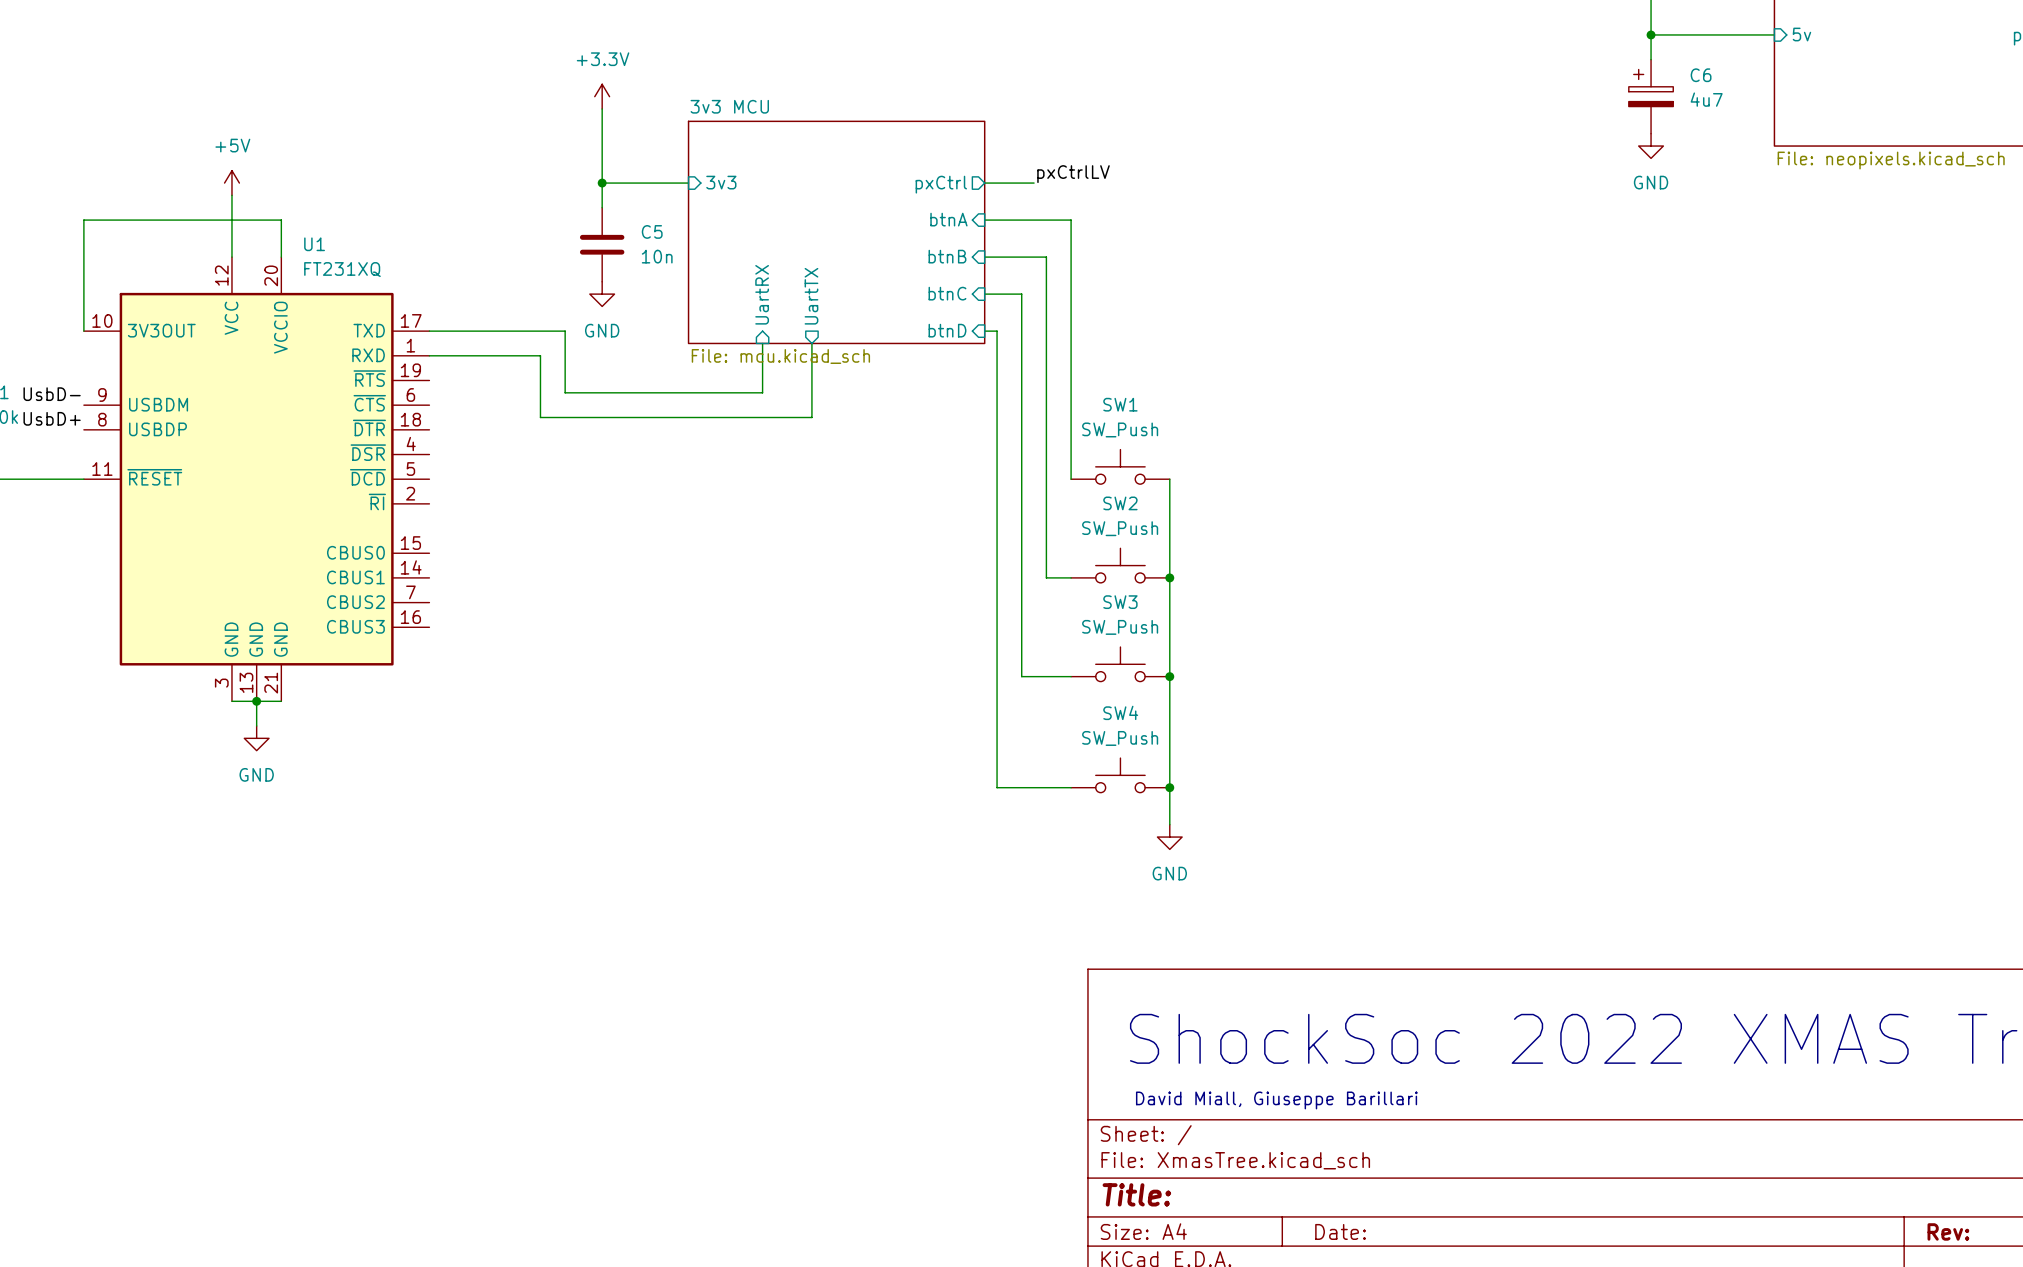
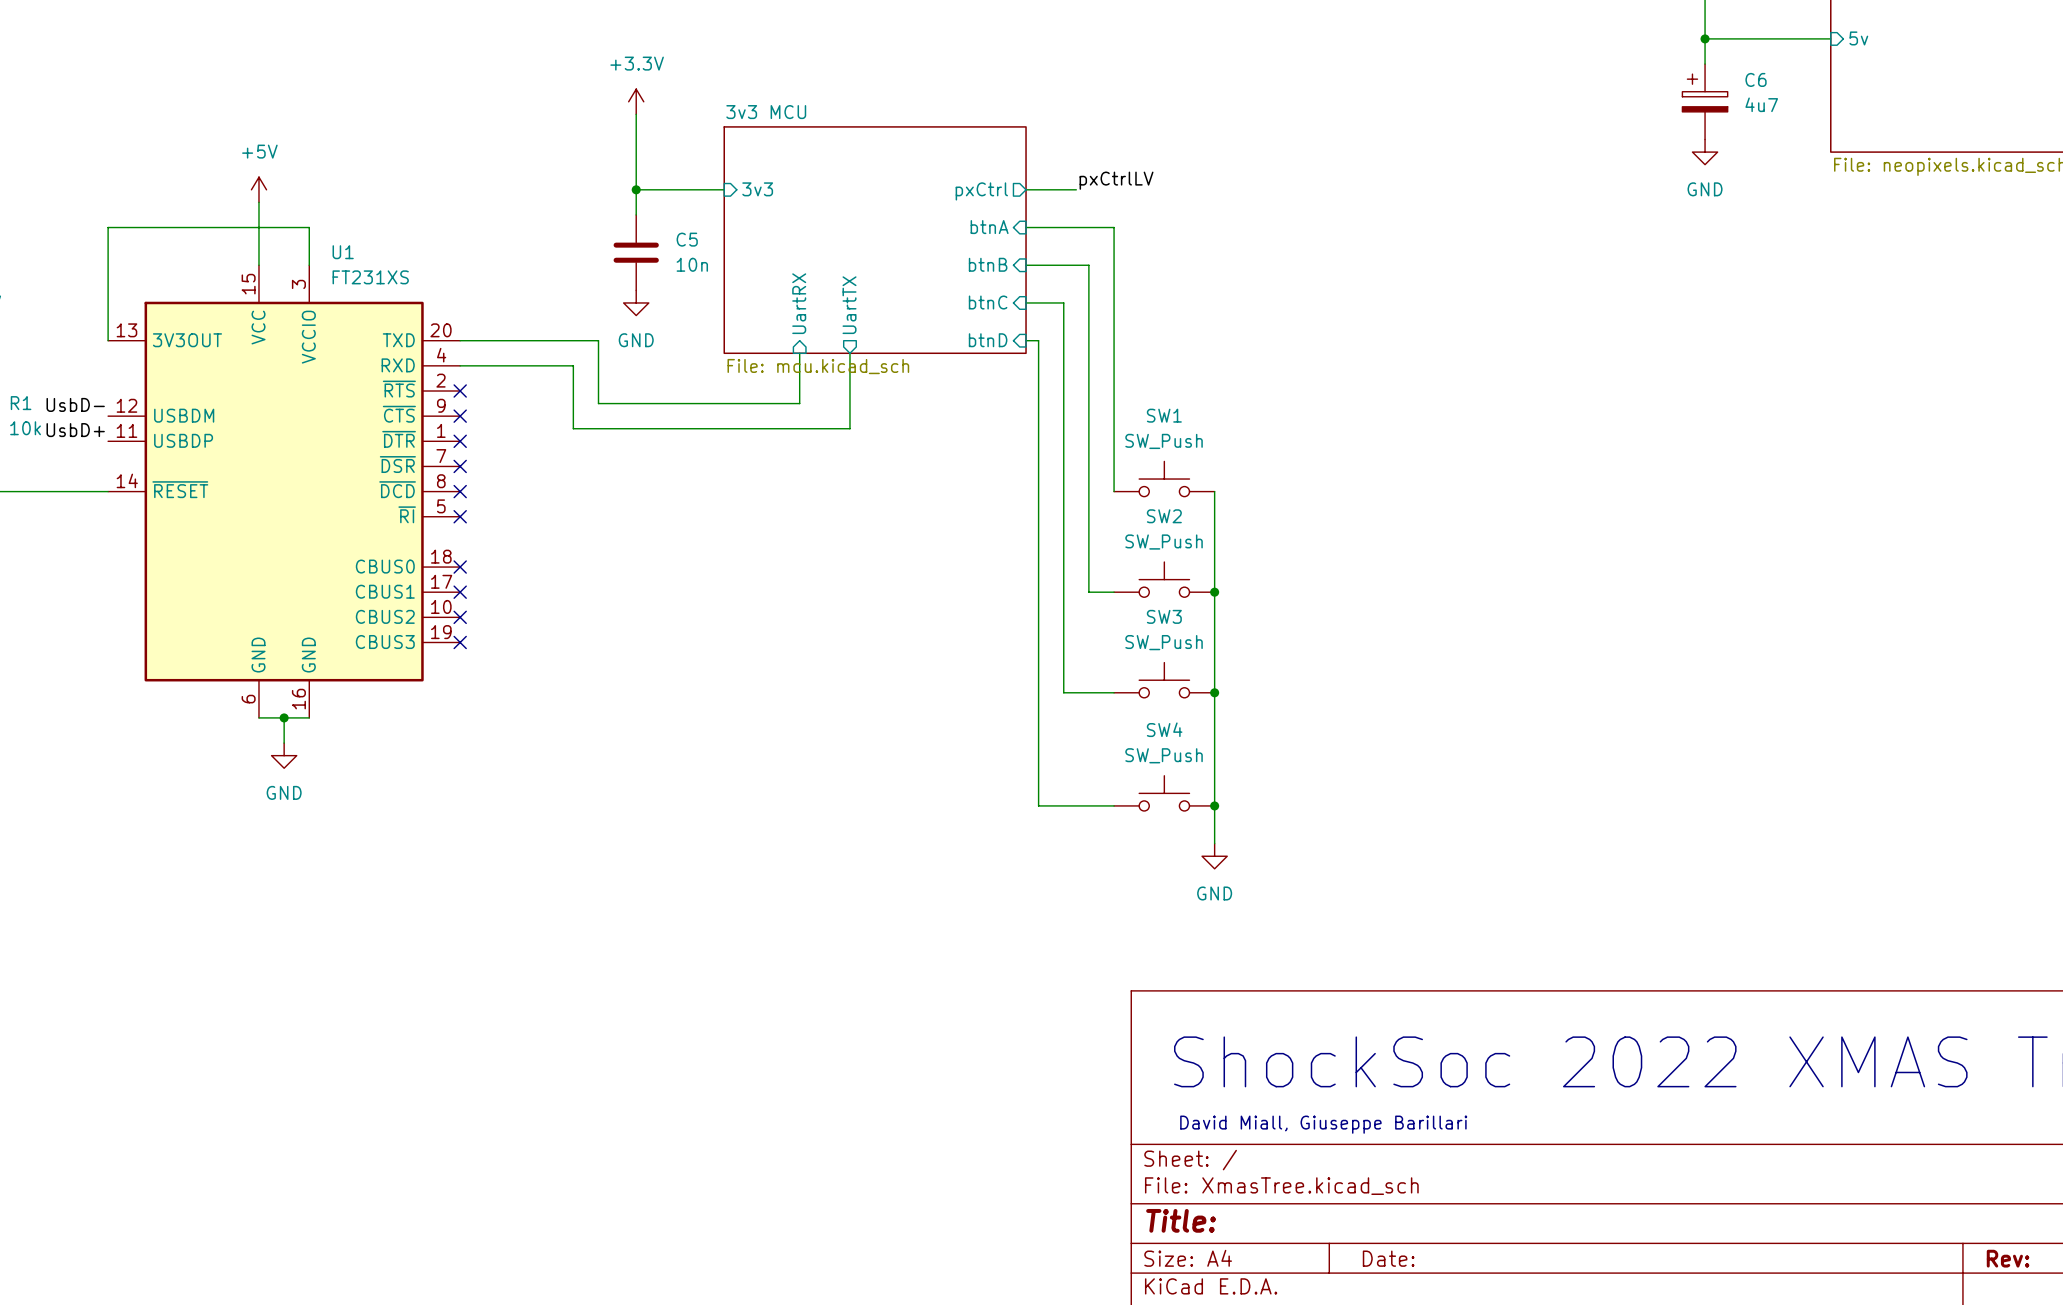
U1 symbol: [83, 257, 430, 702] -> [108, 265, 461, 718]
U1 value: FT231XQ (342, 269) -> FT231XS (370, 277)
no-connect mark: none -> (460, 391)
no-connect mark: none -> (460, 416)
no-connect mark: none -> (460, 441)
no-connect mark: none -> (460, 466)
no-connect mark: none -> (460, 491)
no-connect mark: none -> (460, 516)
no-connect mark: none -> (460, 567)
no-connect mark: none -> (460, 592)
no-connect mark: none -> (460, 617)
no-connect mark: none -> (460, 642)

